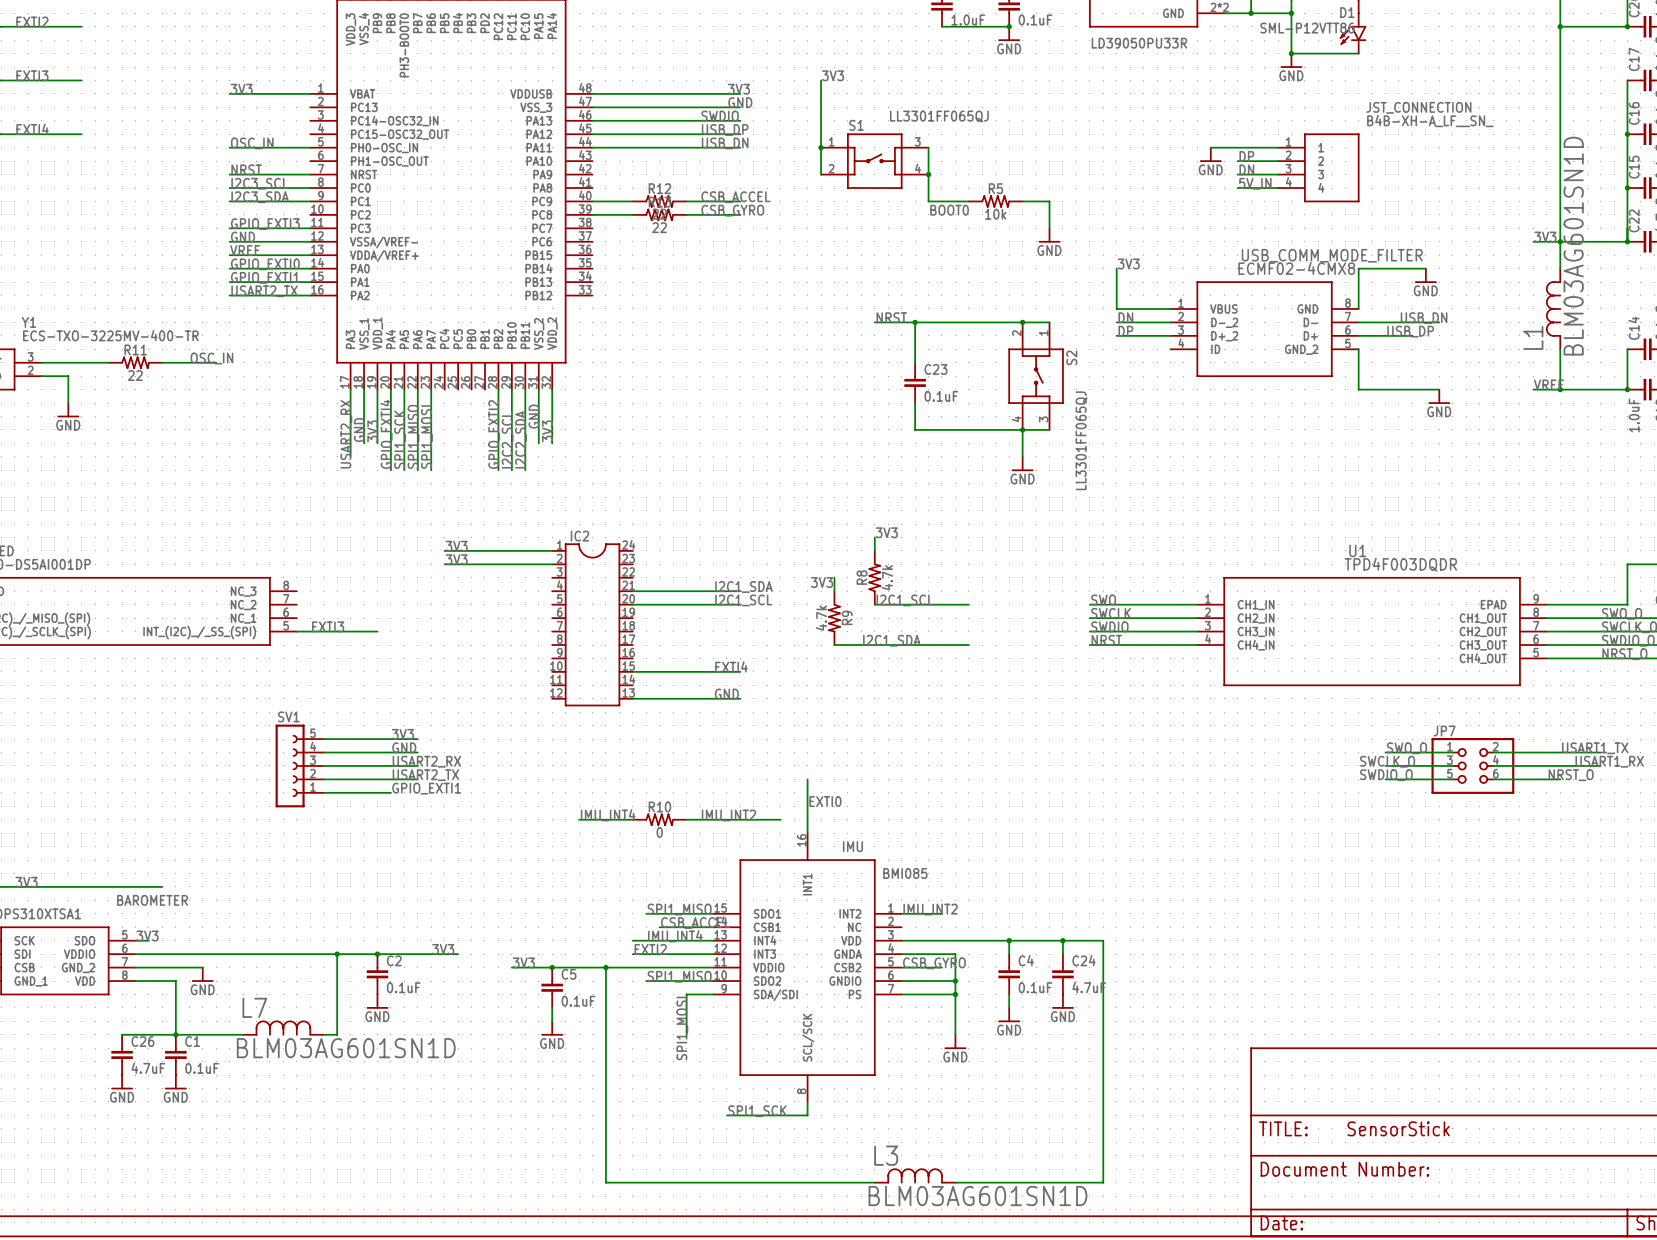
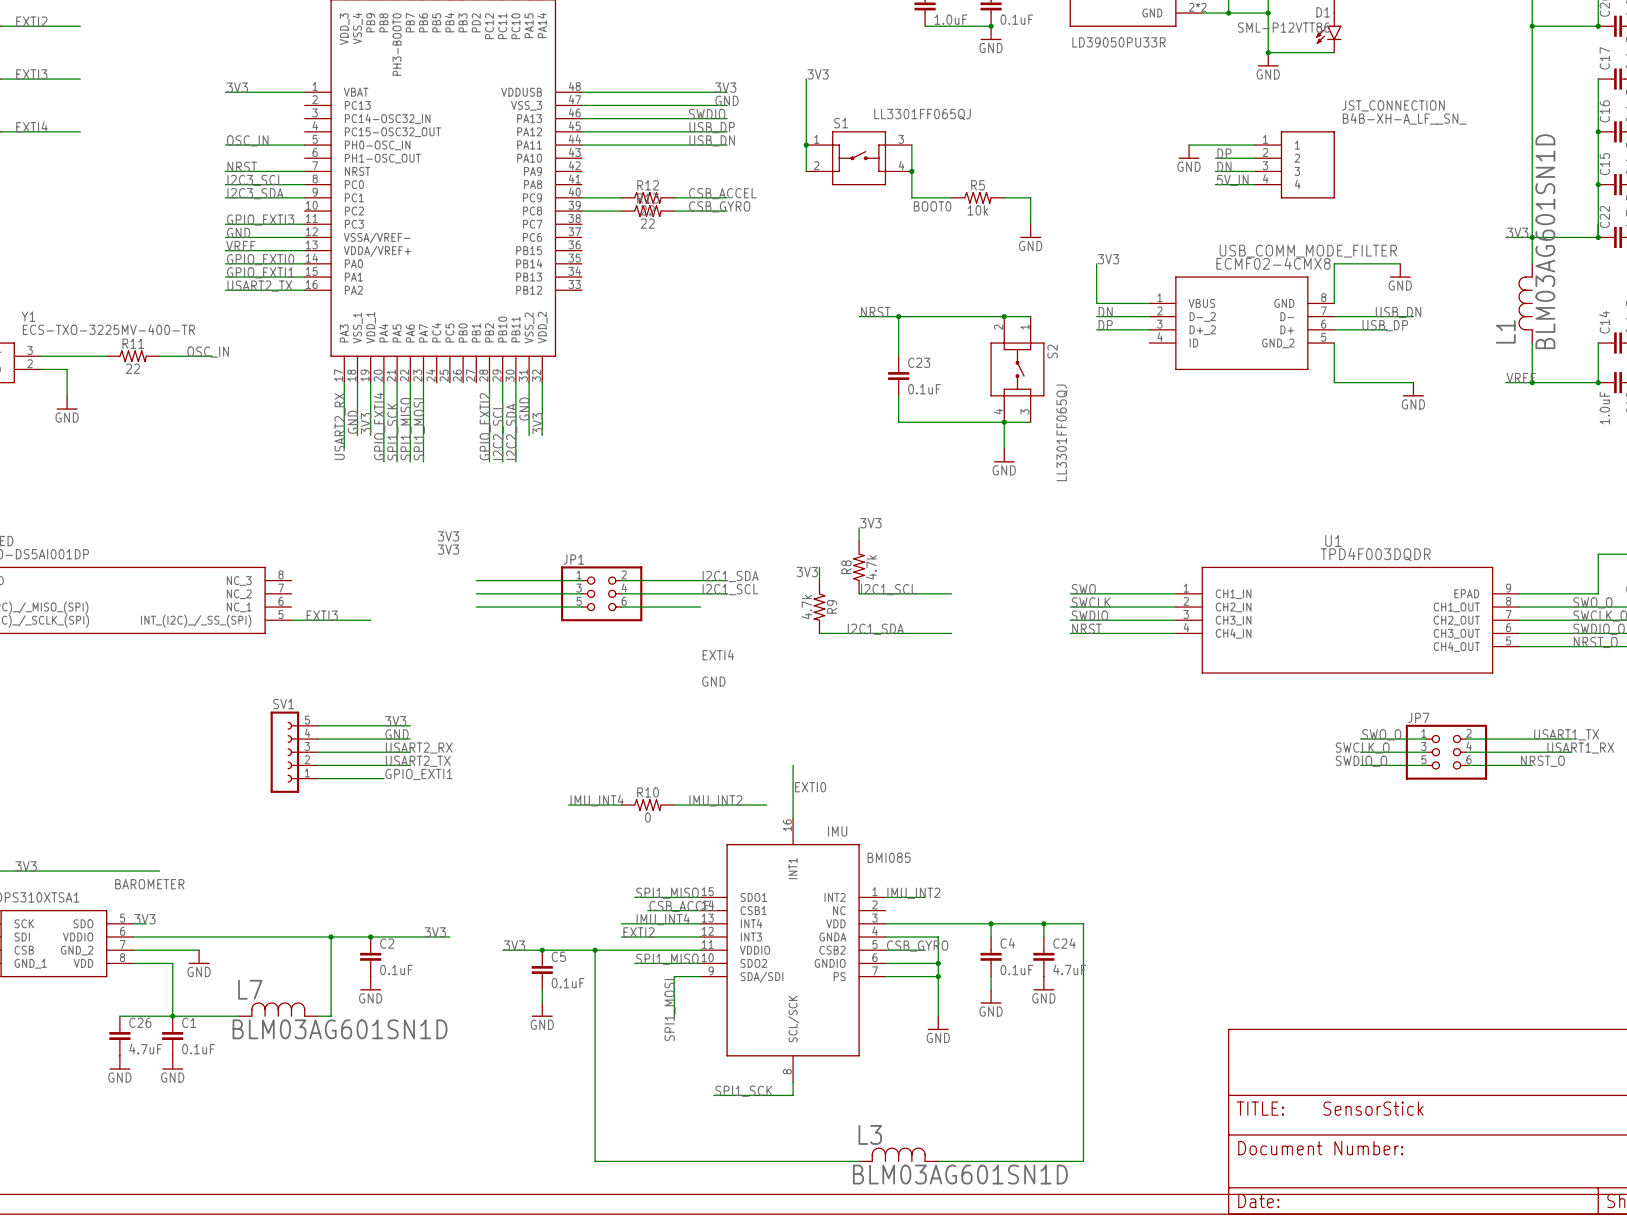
wire: (444, 550) (552, 550) -> (476, 580) (581, 580)
wire: (444, 564) (552, 564) -> (476, 593) (581, 593)
JP1: none -> (601, 593)
wire: none -> (476, 607) (581, 607)
wire: none -> (621, 607) (700, 607)
IC2: (592, 624) -> none
wire: (632, 671) (740, 671) -> none
wire: (632, 698) (740, 698) -> none

